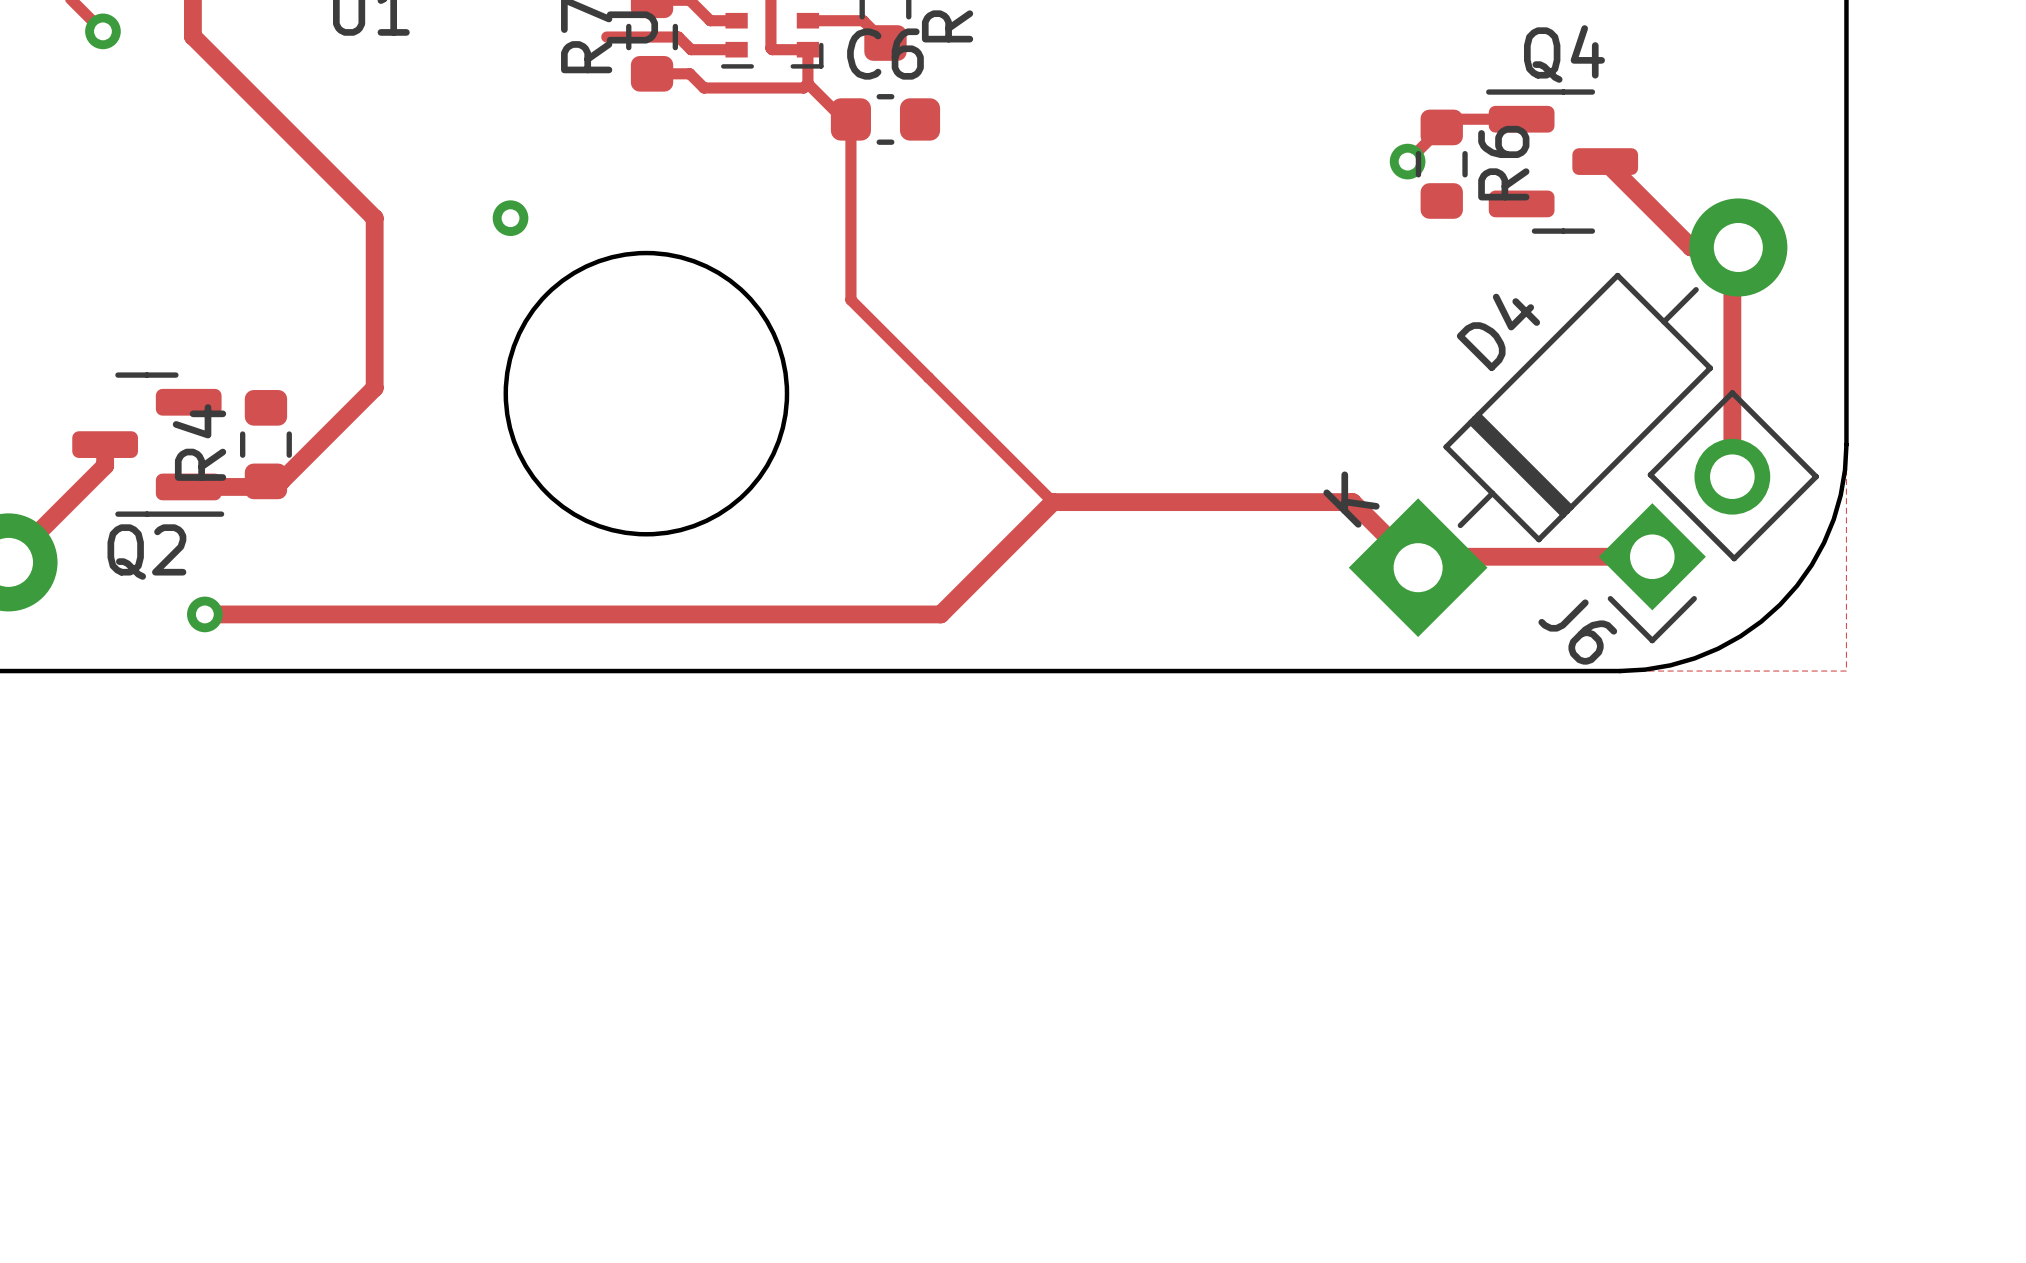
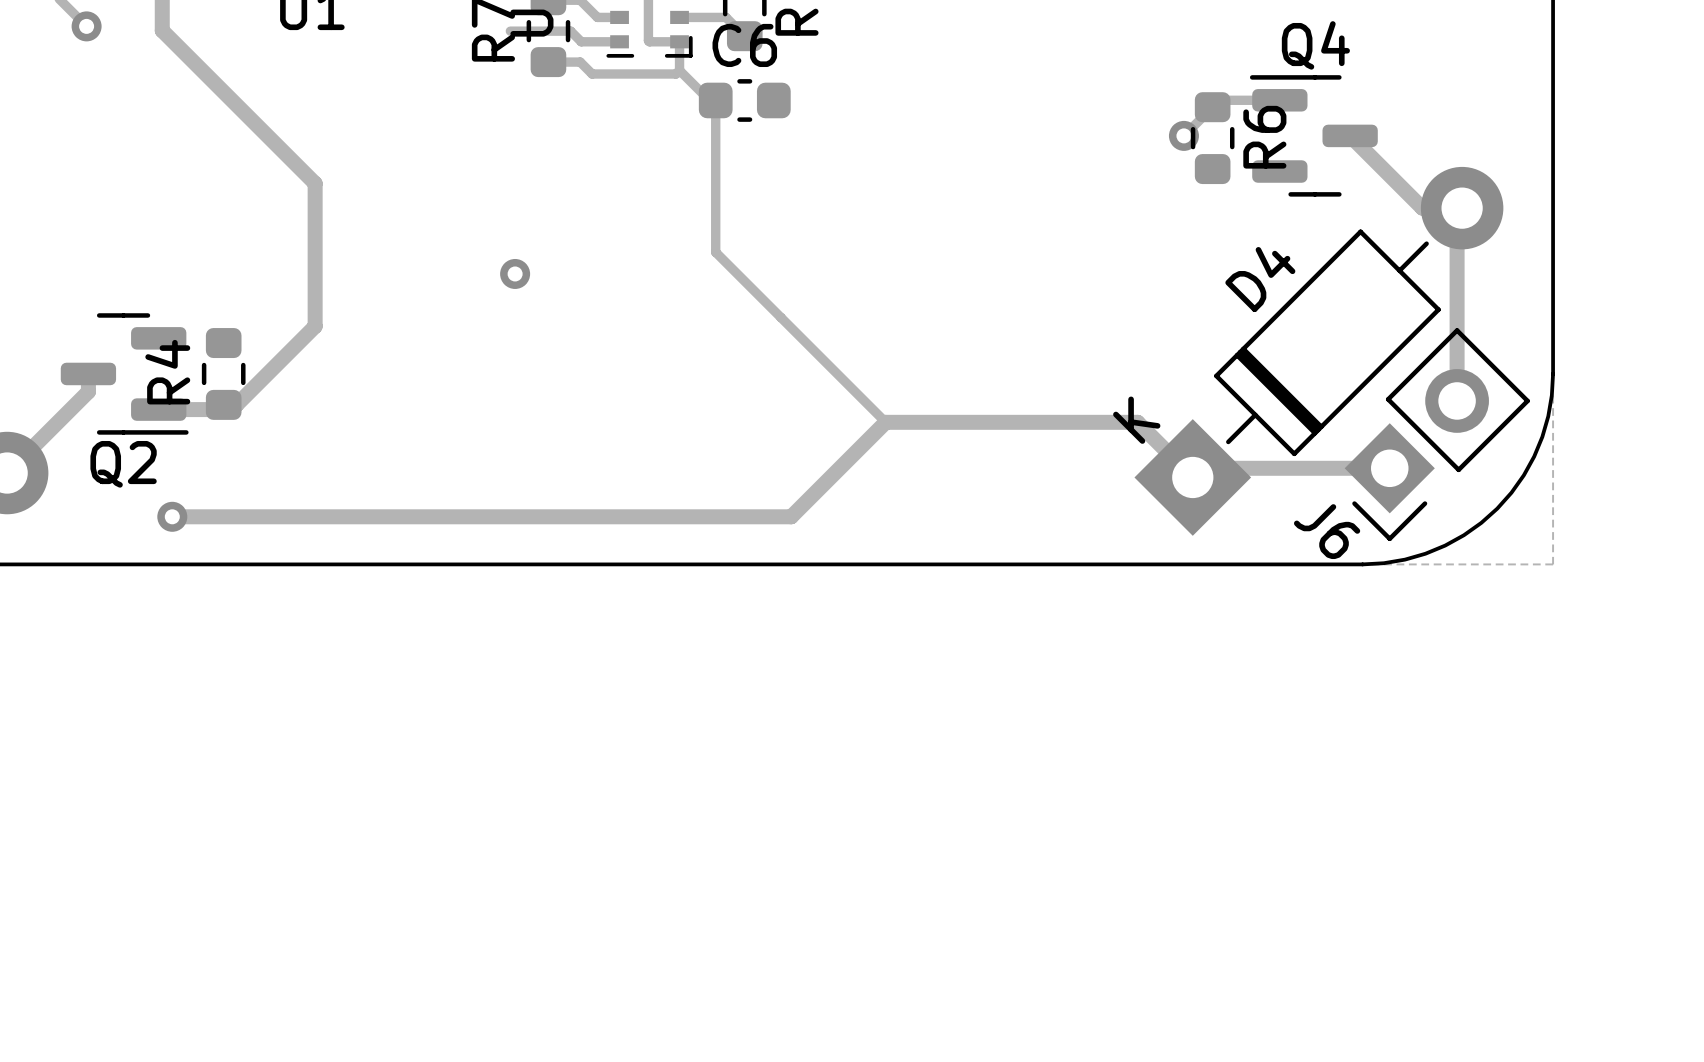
via position: (510, 218) -> (515, 273)
round board edge: [503, 250, 790, 537] -> none

